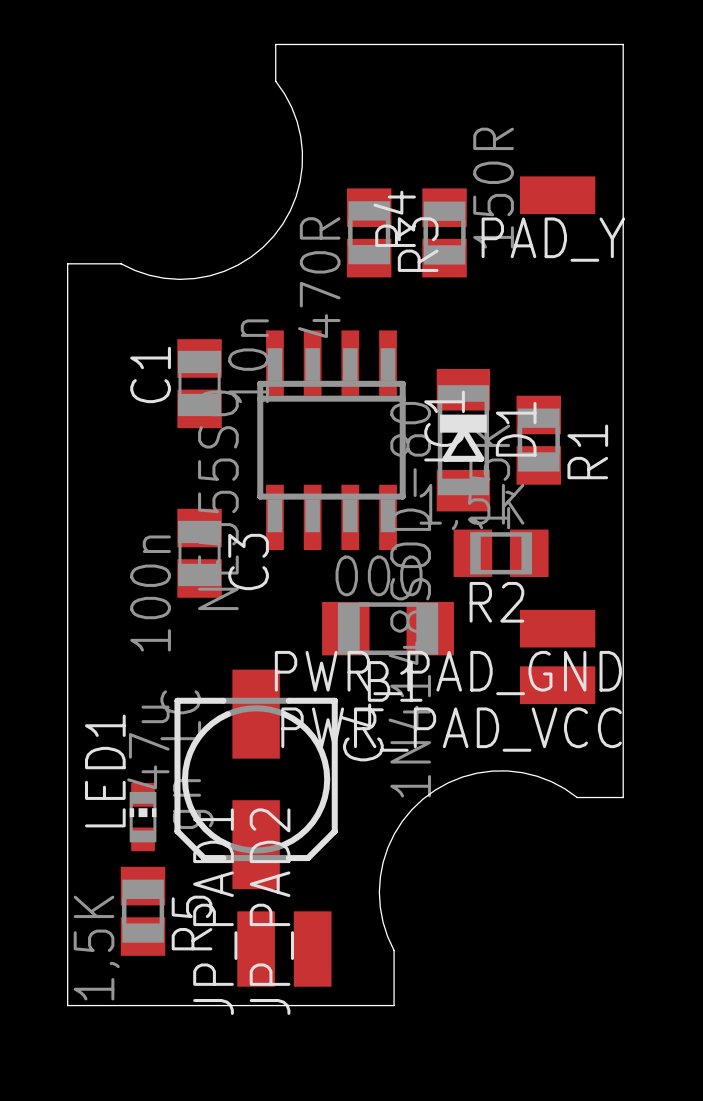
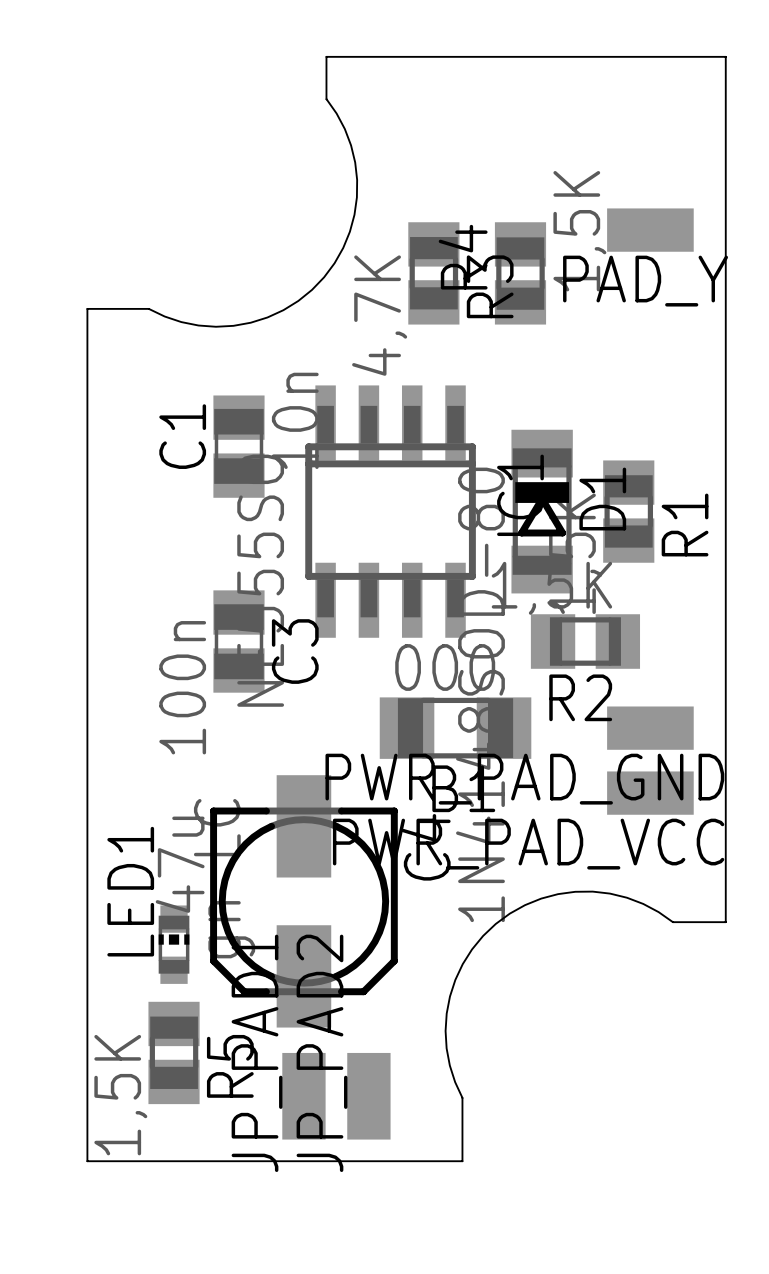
R4 value: 150R (493, 188) -> 1,5K (579, 231)
R3 value: 470R (319, 277) -> 4,7K (379, 315)

